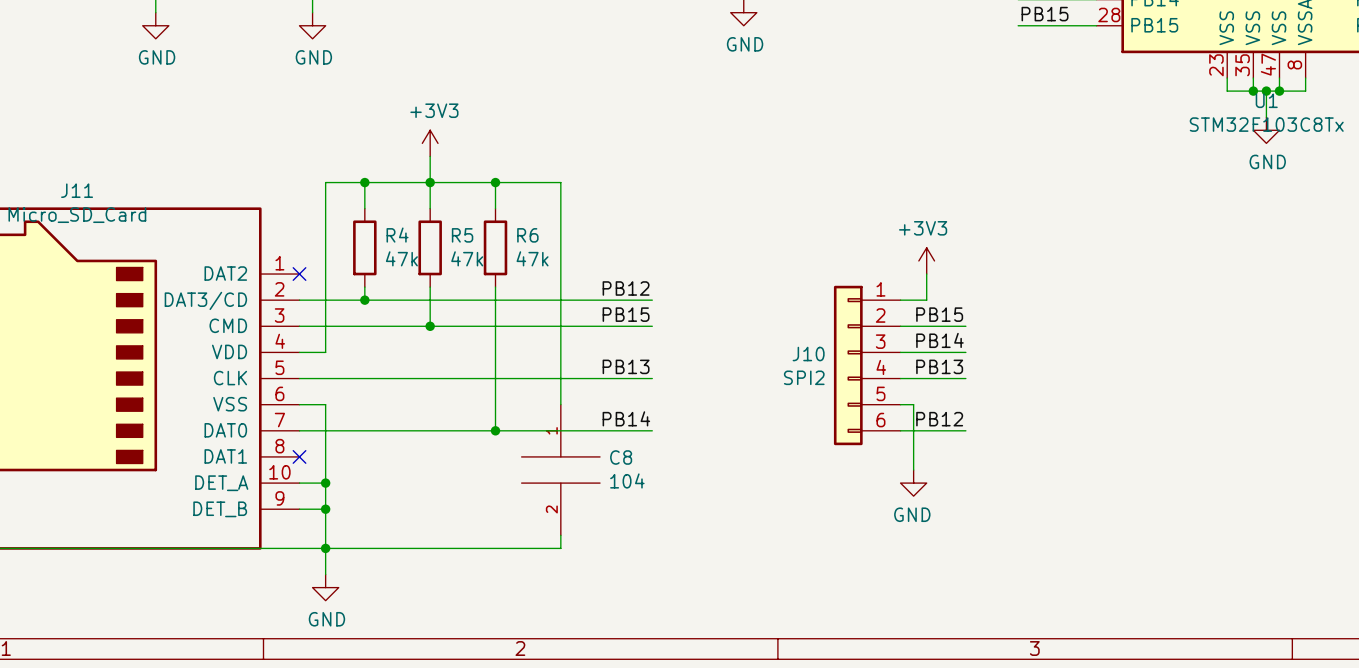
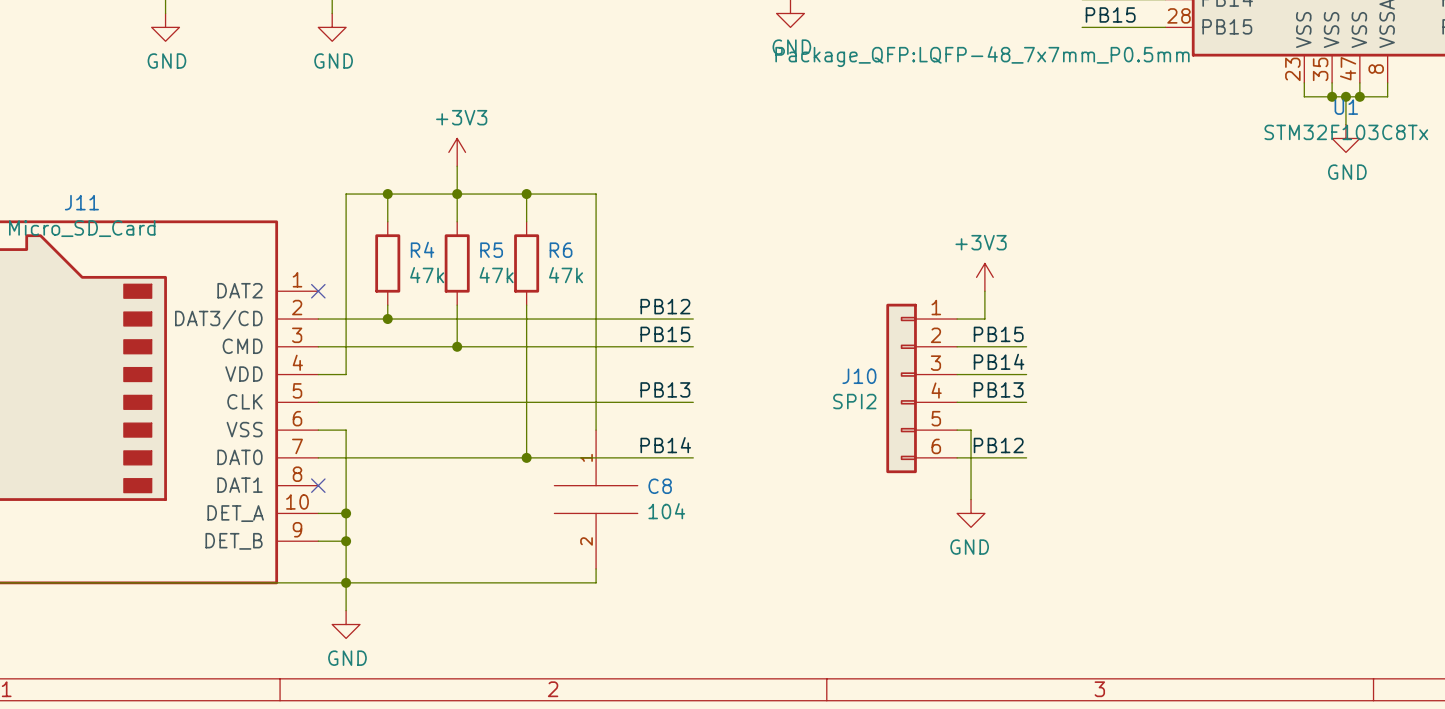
U1 text: none -> Package_QFP:LQFP-48_7x7mm_P0.5mm (982, 56)

